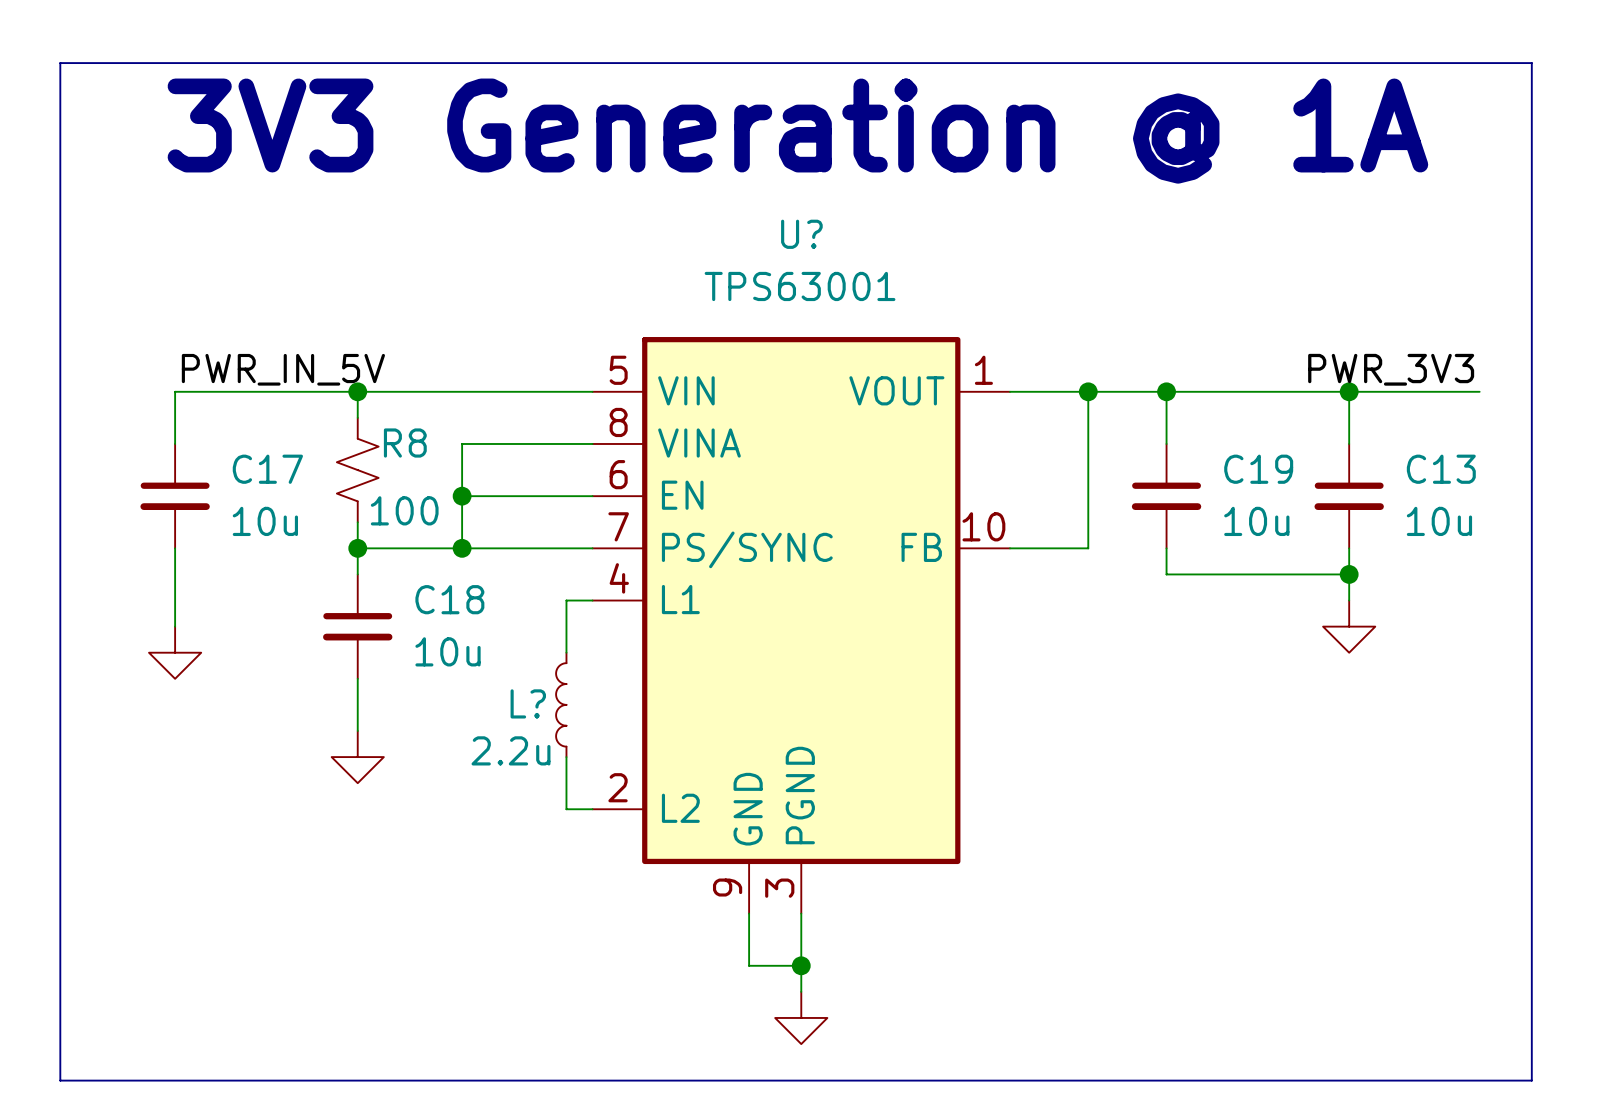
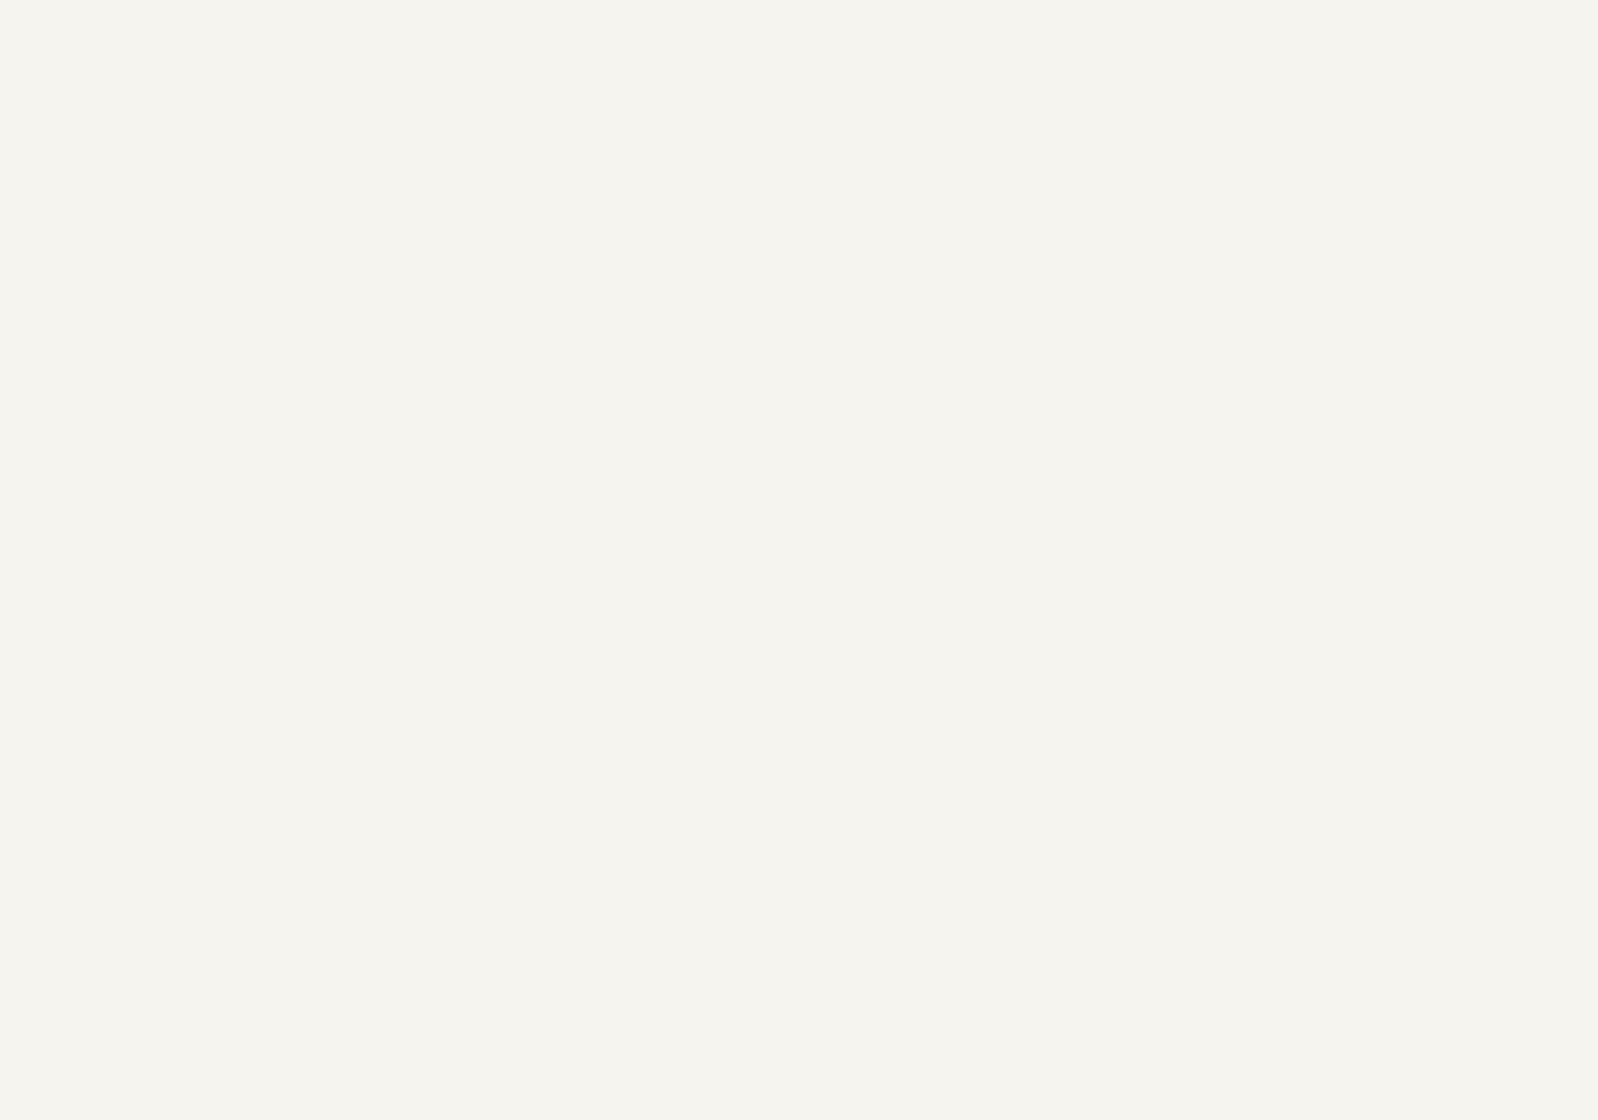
line: (60, 63) (1531, 63) (1531, 1080) (60, 1080) (60, 63) -> none
text: 3V3 Generation @ 1A (797, 131) -> none
label: PWR_IN_5V (283, 369) -> none
label: PWR_3V3 (1391, 369) -> none
wire: (357, 391) (357, 417) -> none
junction: (357, 391) -> none
wire: (592, 391) (175, 391) (175, 443) -> none
wire: (1010, 391) (1479, 391) -> none
wire: (1088, 391) (1088, 548) (1010, 548) -> none
junction: (1088, 391) -> none
wire: (1166, 391) (1166, 443) -> none
junction: (1166, 391) -> none
wire: (1349, 391) (1349, 443) -> none
junction: (1349, 391) -> none
wire: (592, 443) (462, 443) (462, 548) -> none
R8: 100 (357, 470) -> none
C17: 10u (175, 496) -> none
wire: (462, 496) (592, 496) -> none
junction: (462, 496) -> none
C19: 10u (1166, 496) -> none
C13: 10u (1349, 496) -> none
wire: (357, 522) (357, 574) -> none
wire: (175, 548) (175, 626) -> none
wire: (357, 548) (592, 548) -> none
junction: (357, 548) -> none
junction: (462, 548) -> none
wire: (1166, 548) (1166, 574) (1349, 574) -> none
wire: (1349, 548) (1349, 600) -> none
junction: (1349, 574) -> none
wire: (592, 600) (566, 600) (566, 652) -> none
U?: TPS63001 (801, 625) -> none
C18: 10u (357, 626) -> none
power symbol: (1349, 626) -> none
power symbol: (175, 652) -> none
wire: (357, 678) (357, 730) -> none
L?: 2.2u (561, 704) -> none
power symbol: (357, 757) -> none
wire: (566, 757) (566, 809) (592, 809) -> none
wire: (749, 913) (749, 965) (801, 965) -> none
wire: (801, 913) (801, 991) -> none
junction: (801, 965) -> none
power symbol: (801, 1017) -> none

